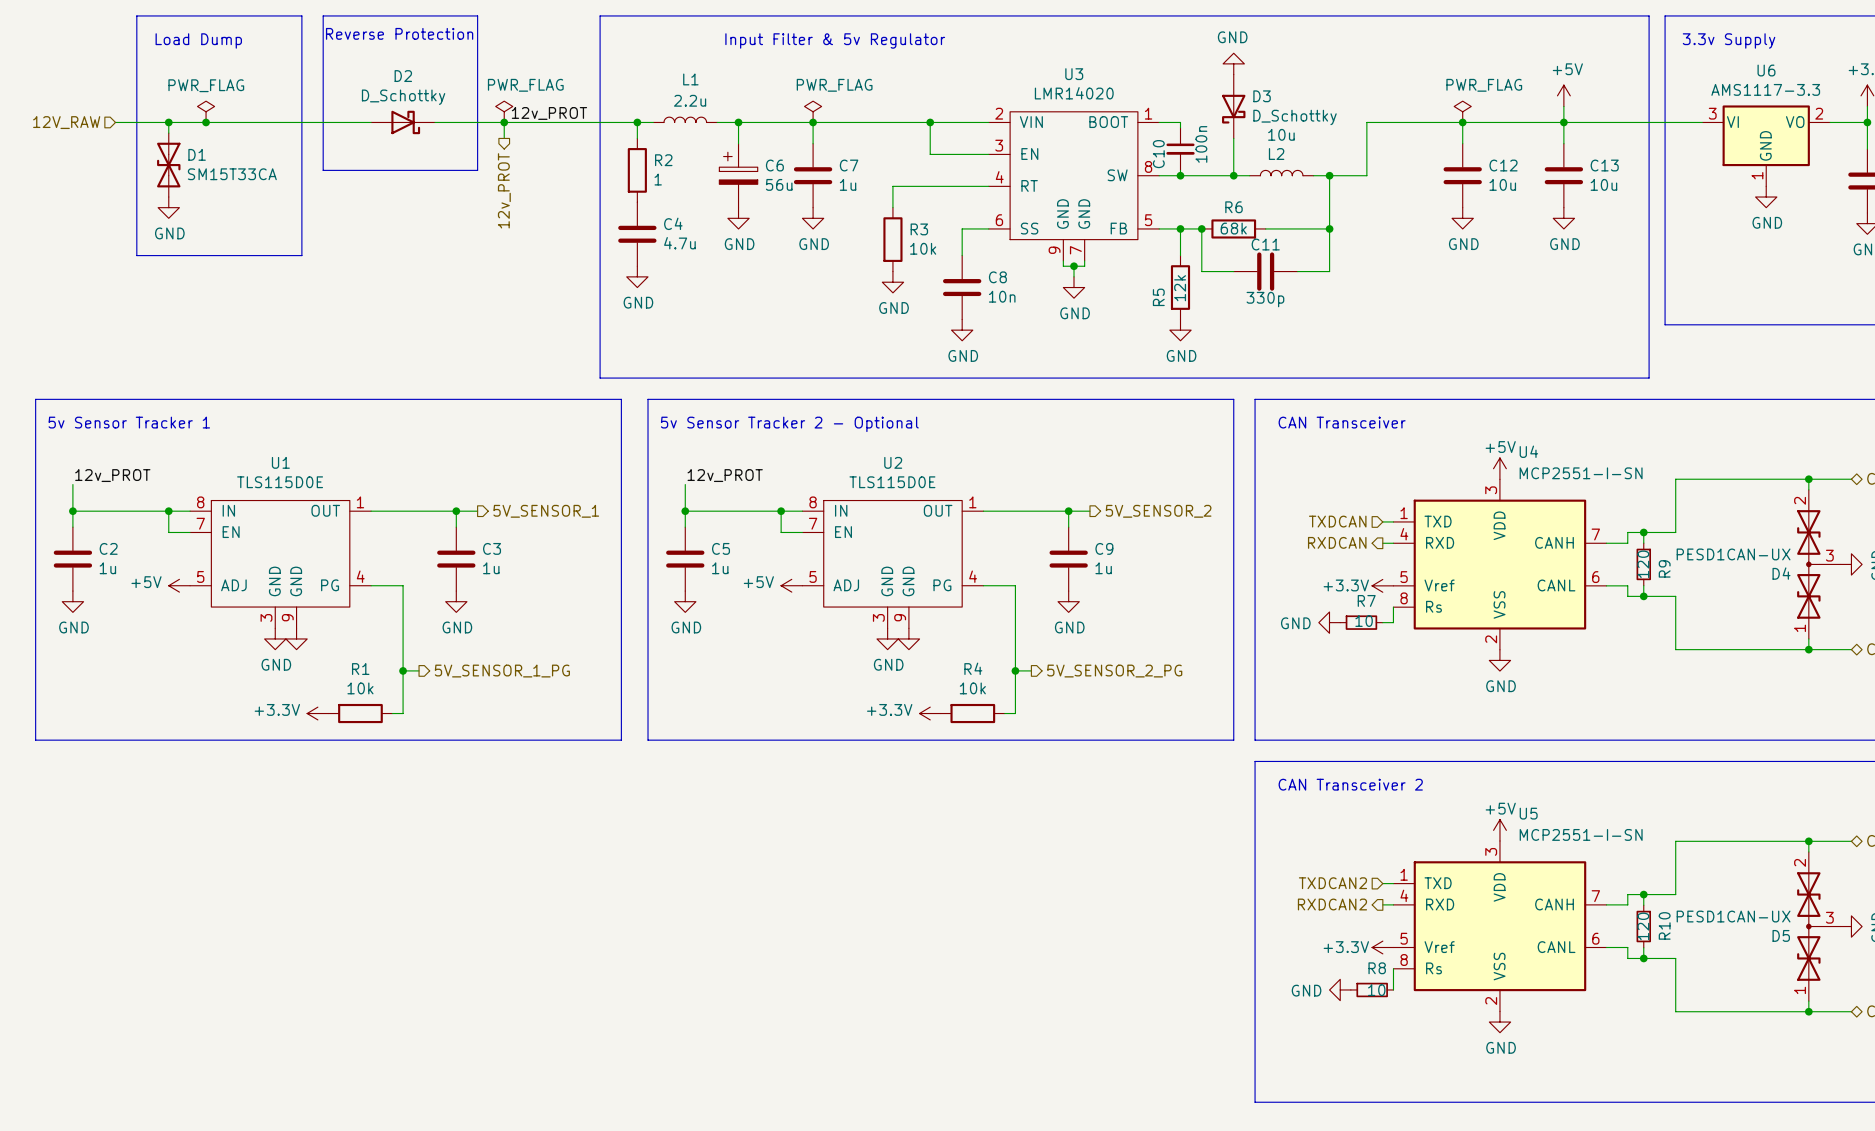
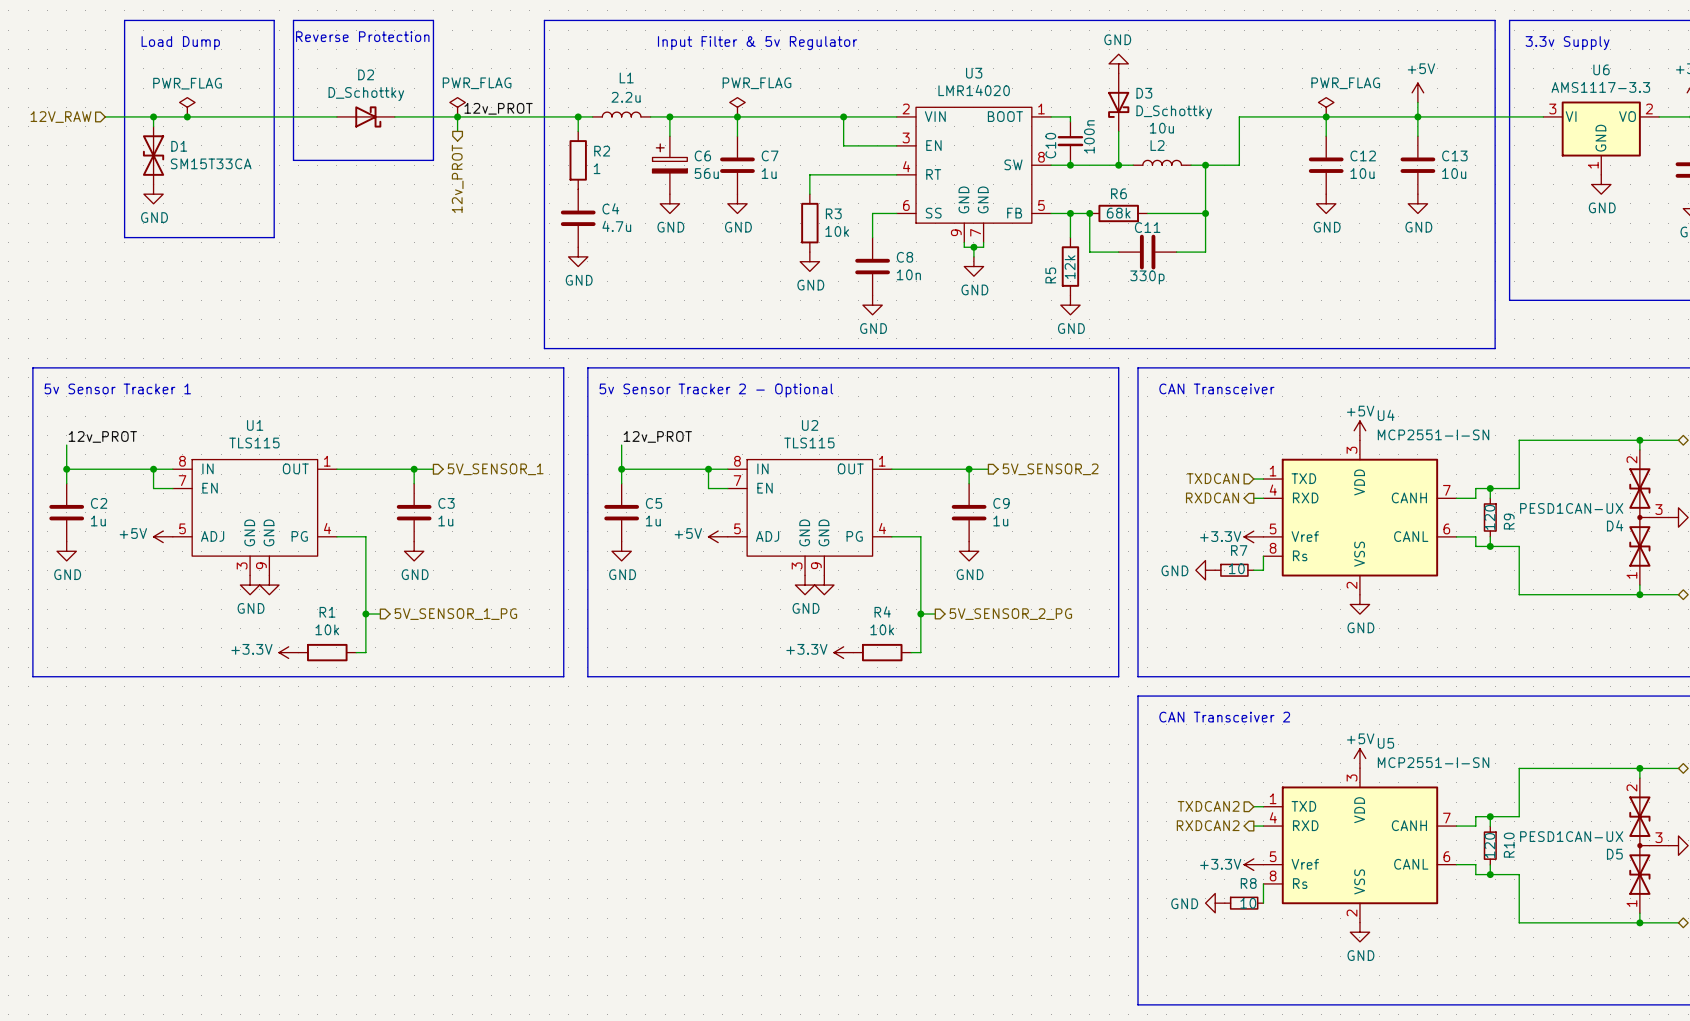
U1 value: TLS115D0E (280, 482) -> TLS115 (254, 443)
U2 value: TLS115D0E (892, 482) -> TLS115 (809, 443)

